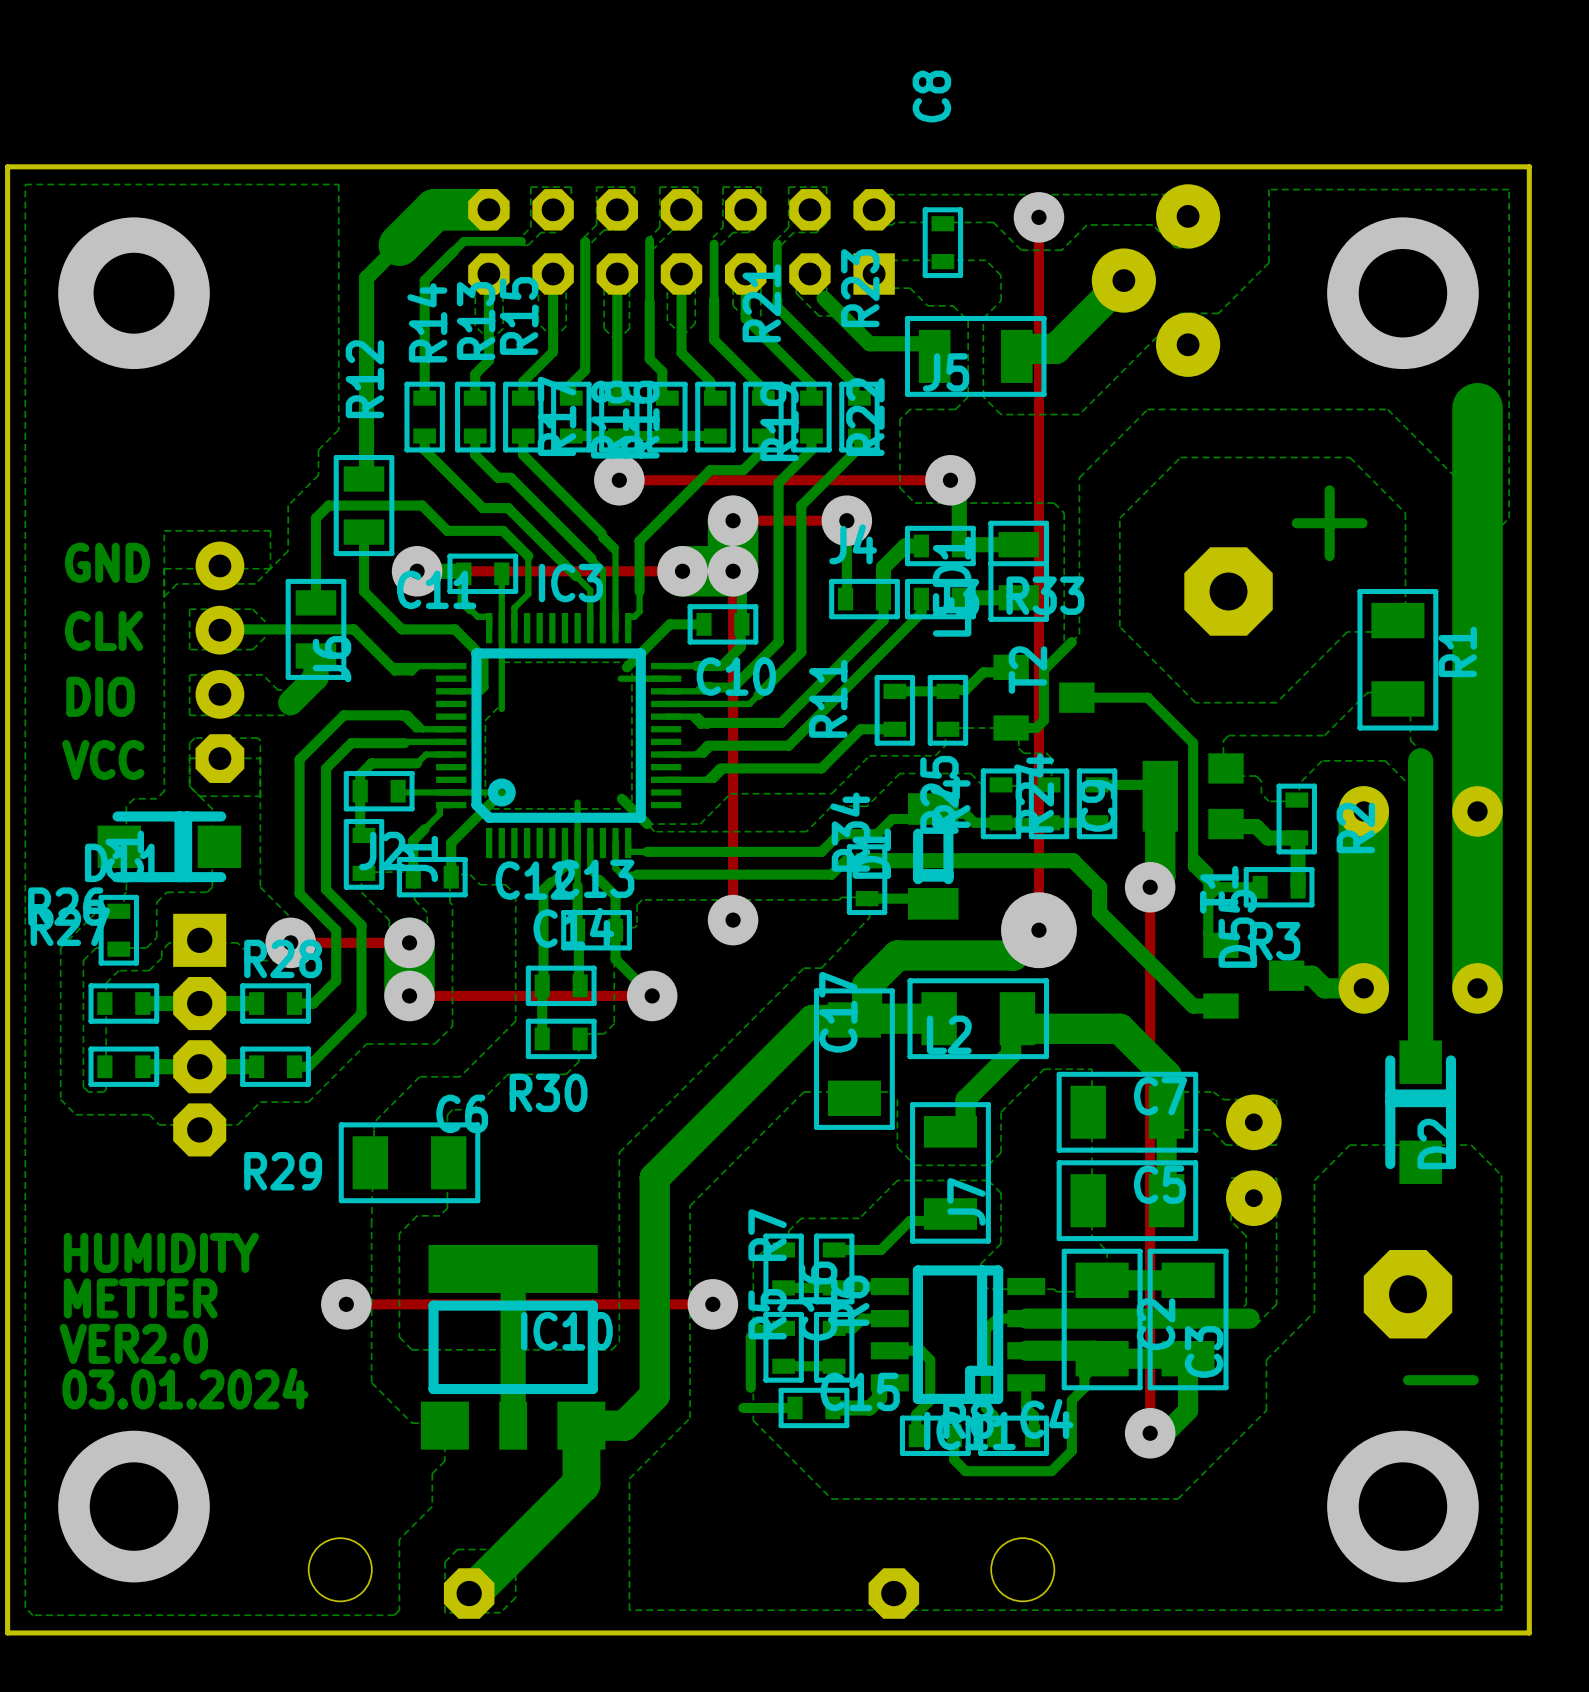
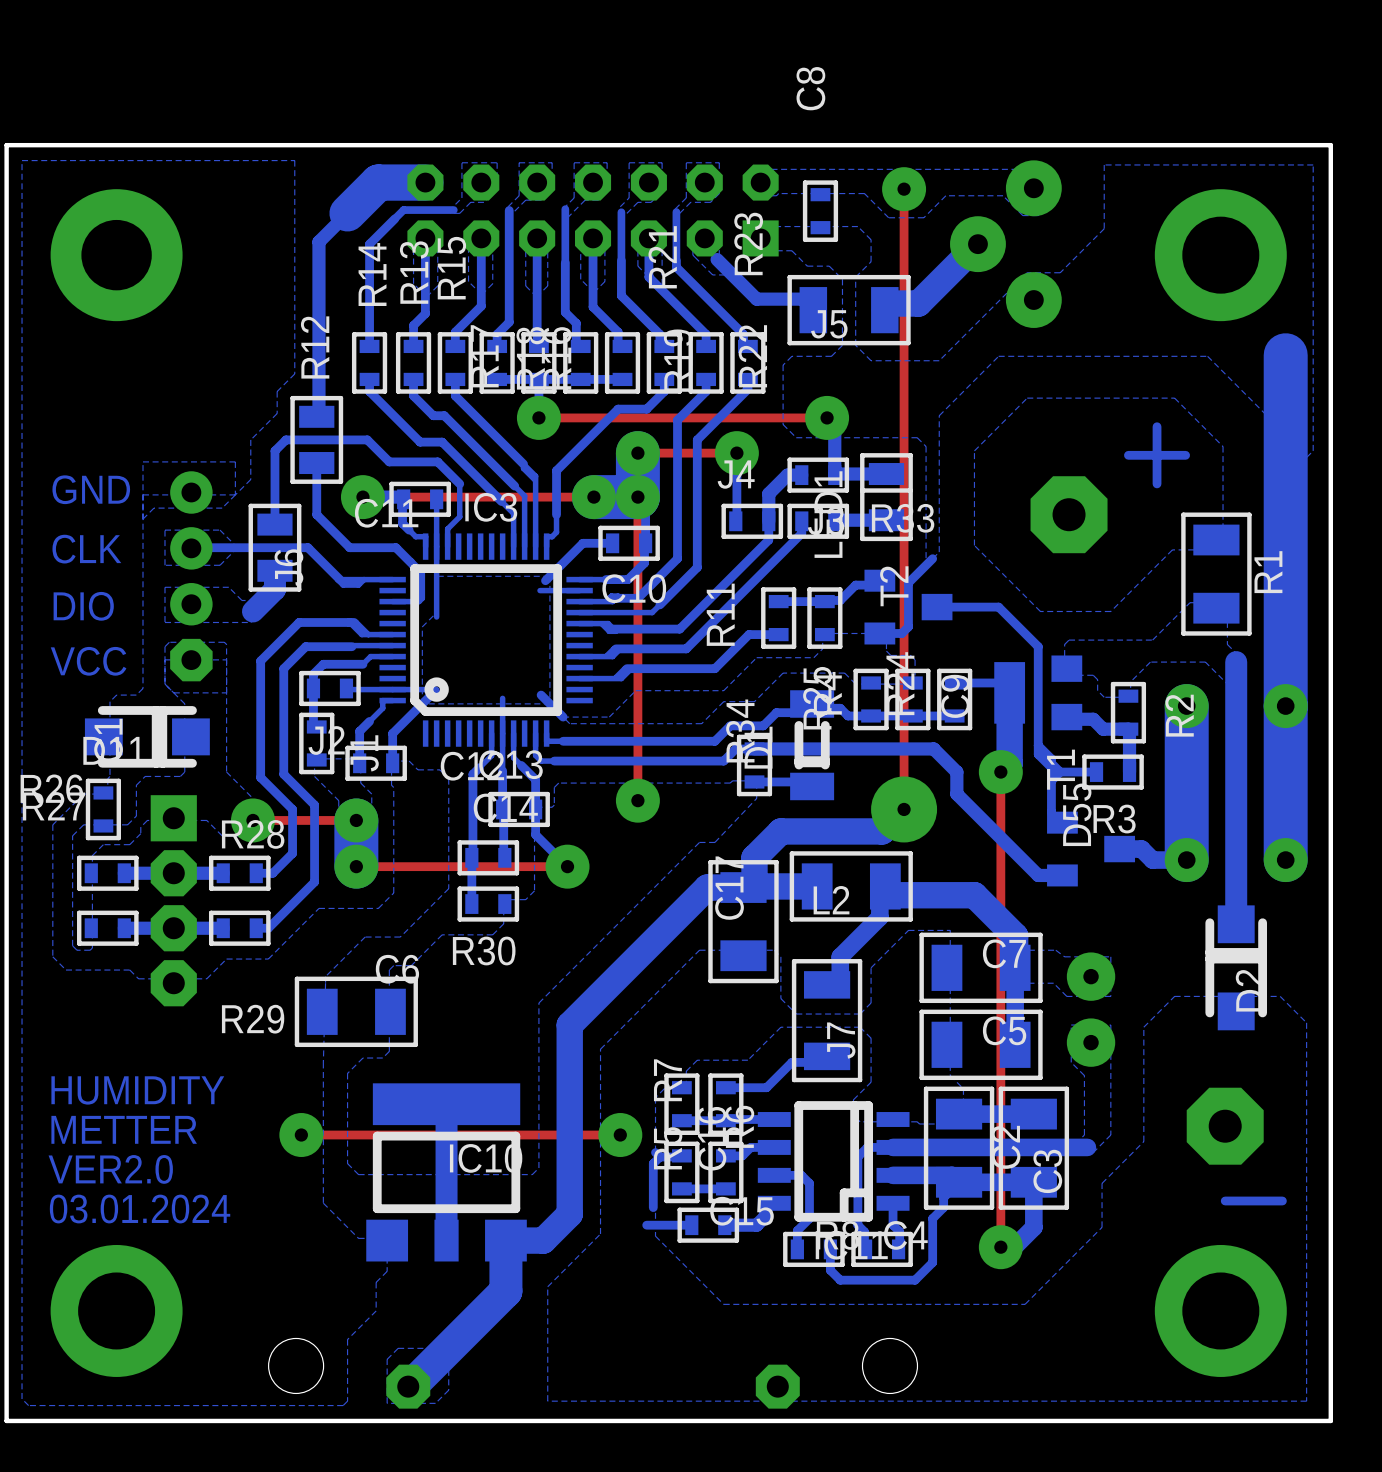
R12 name position: R12 (364, 379) -> R12 (315, 347)

